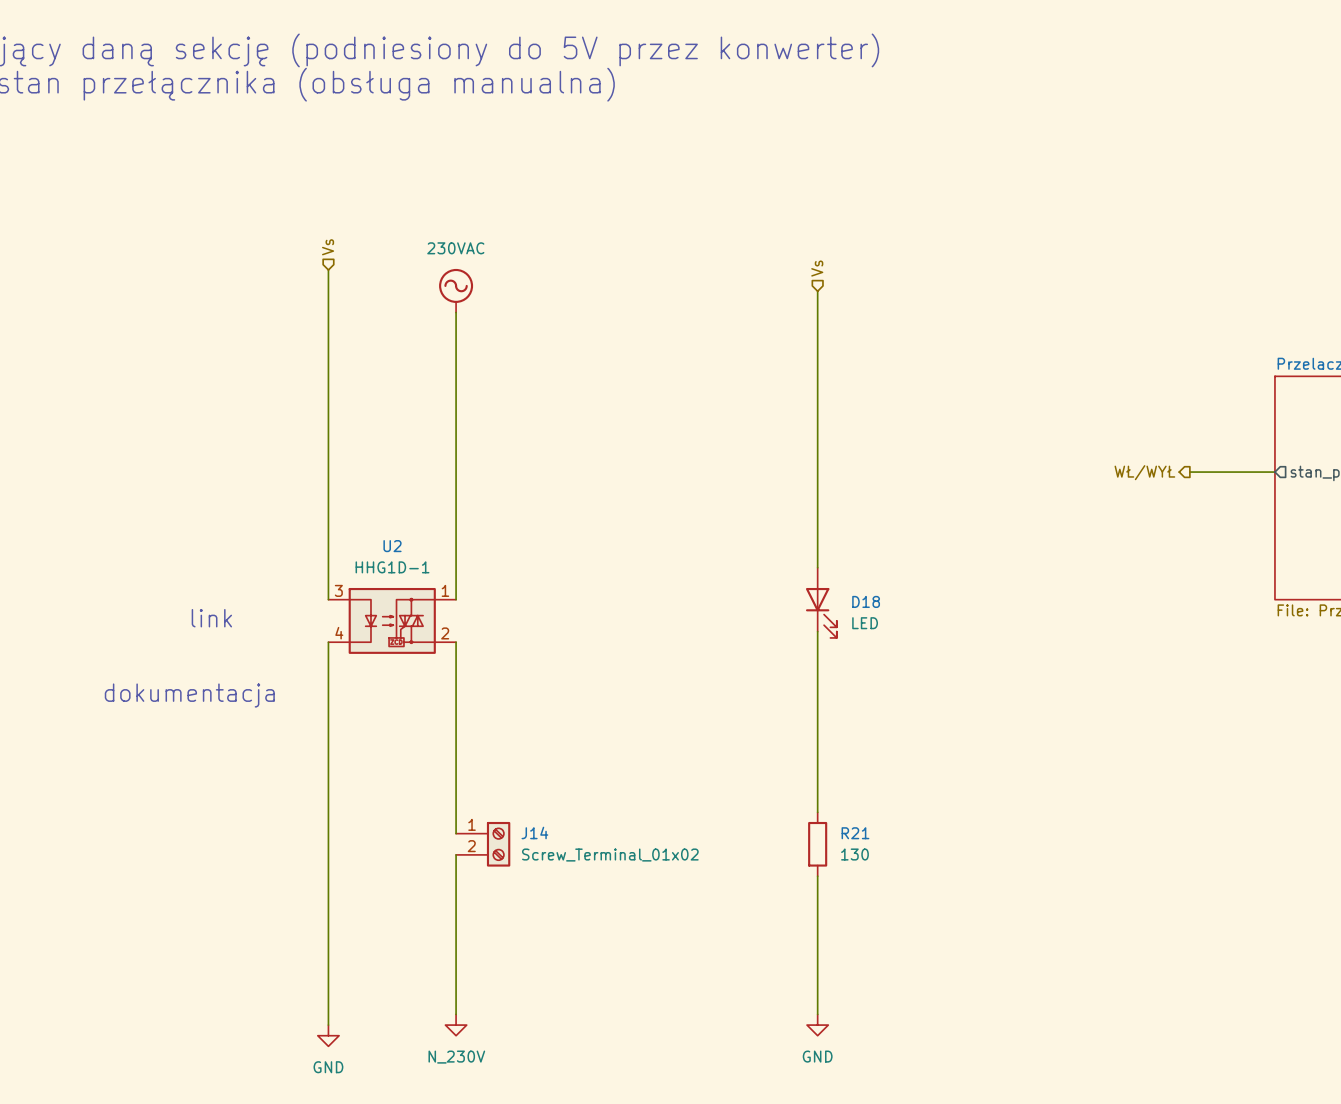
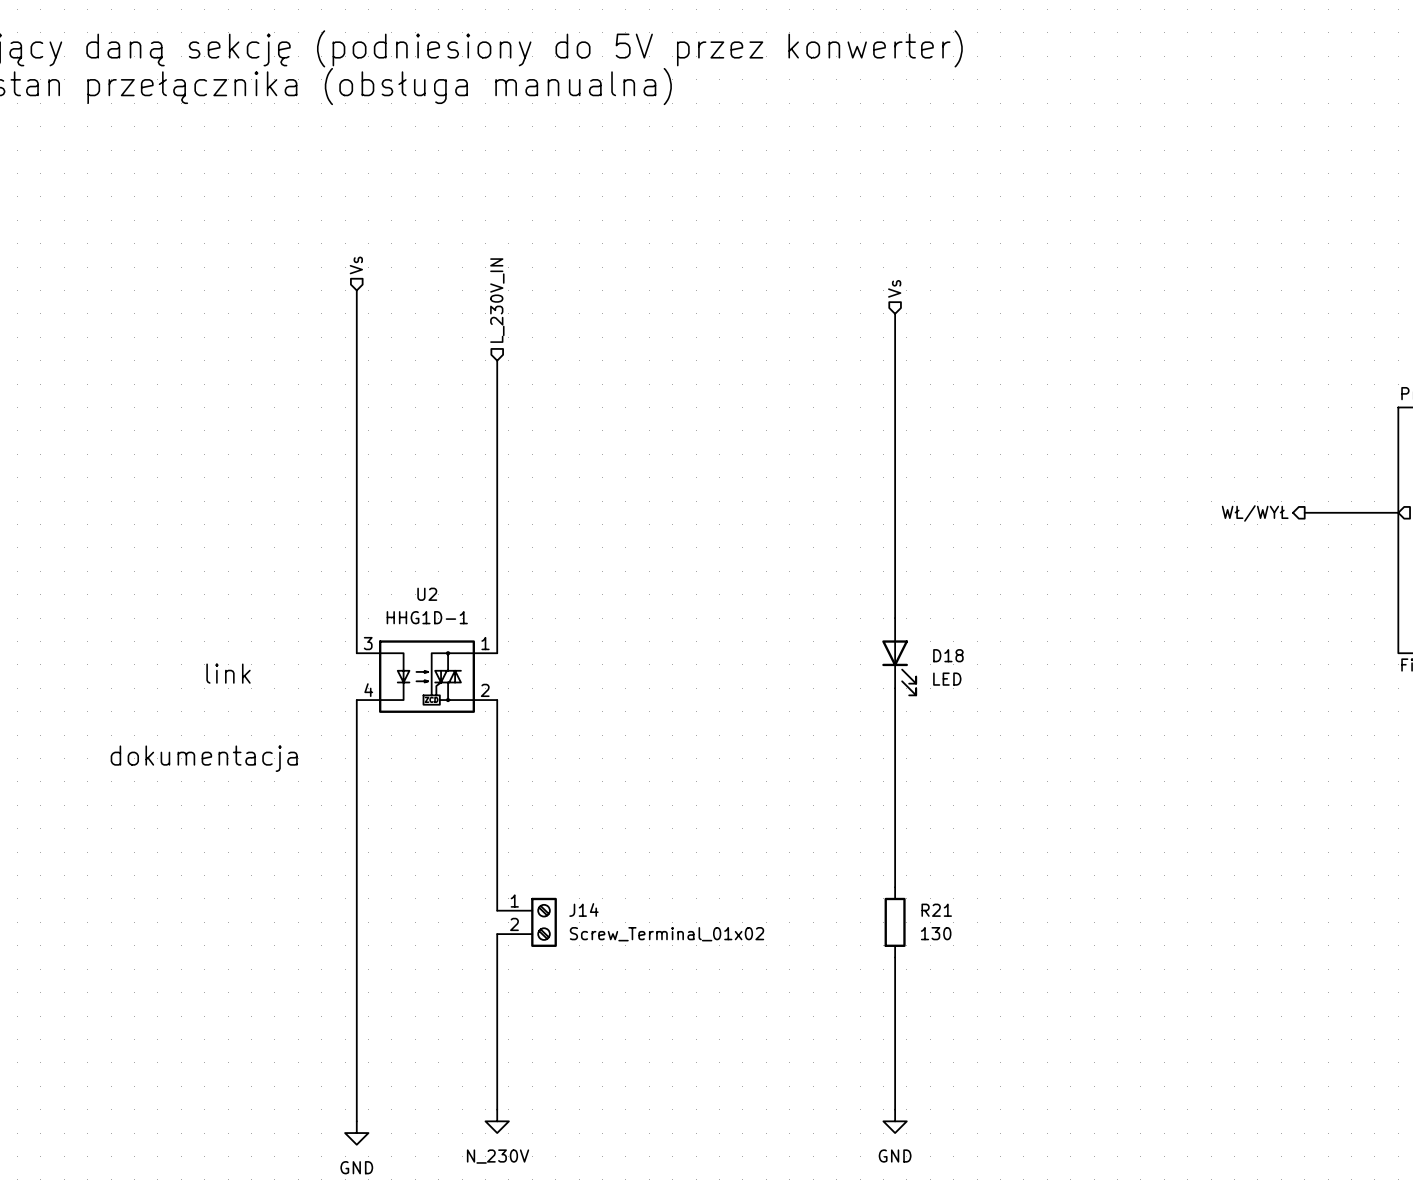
hierarchical label: none -> L_230V_IN (497, 300)
power symbol: 230VAC (456, 290) -> none
wire: (456, 312) (456, 333) -> none

